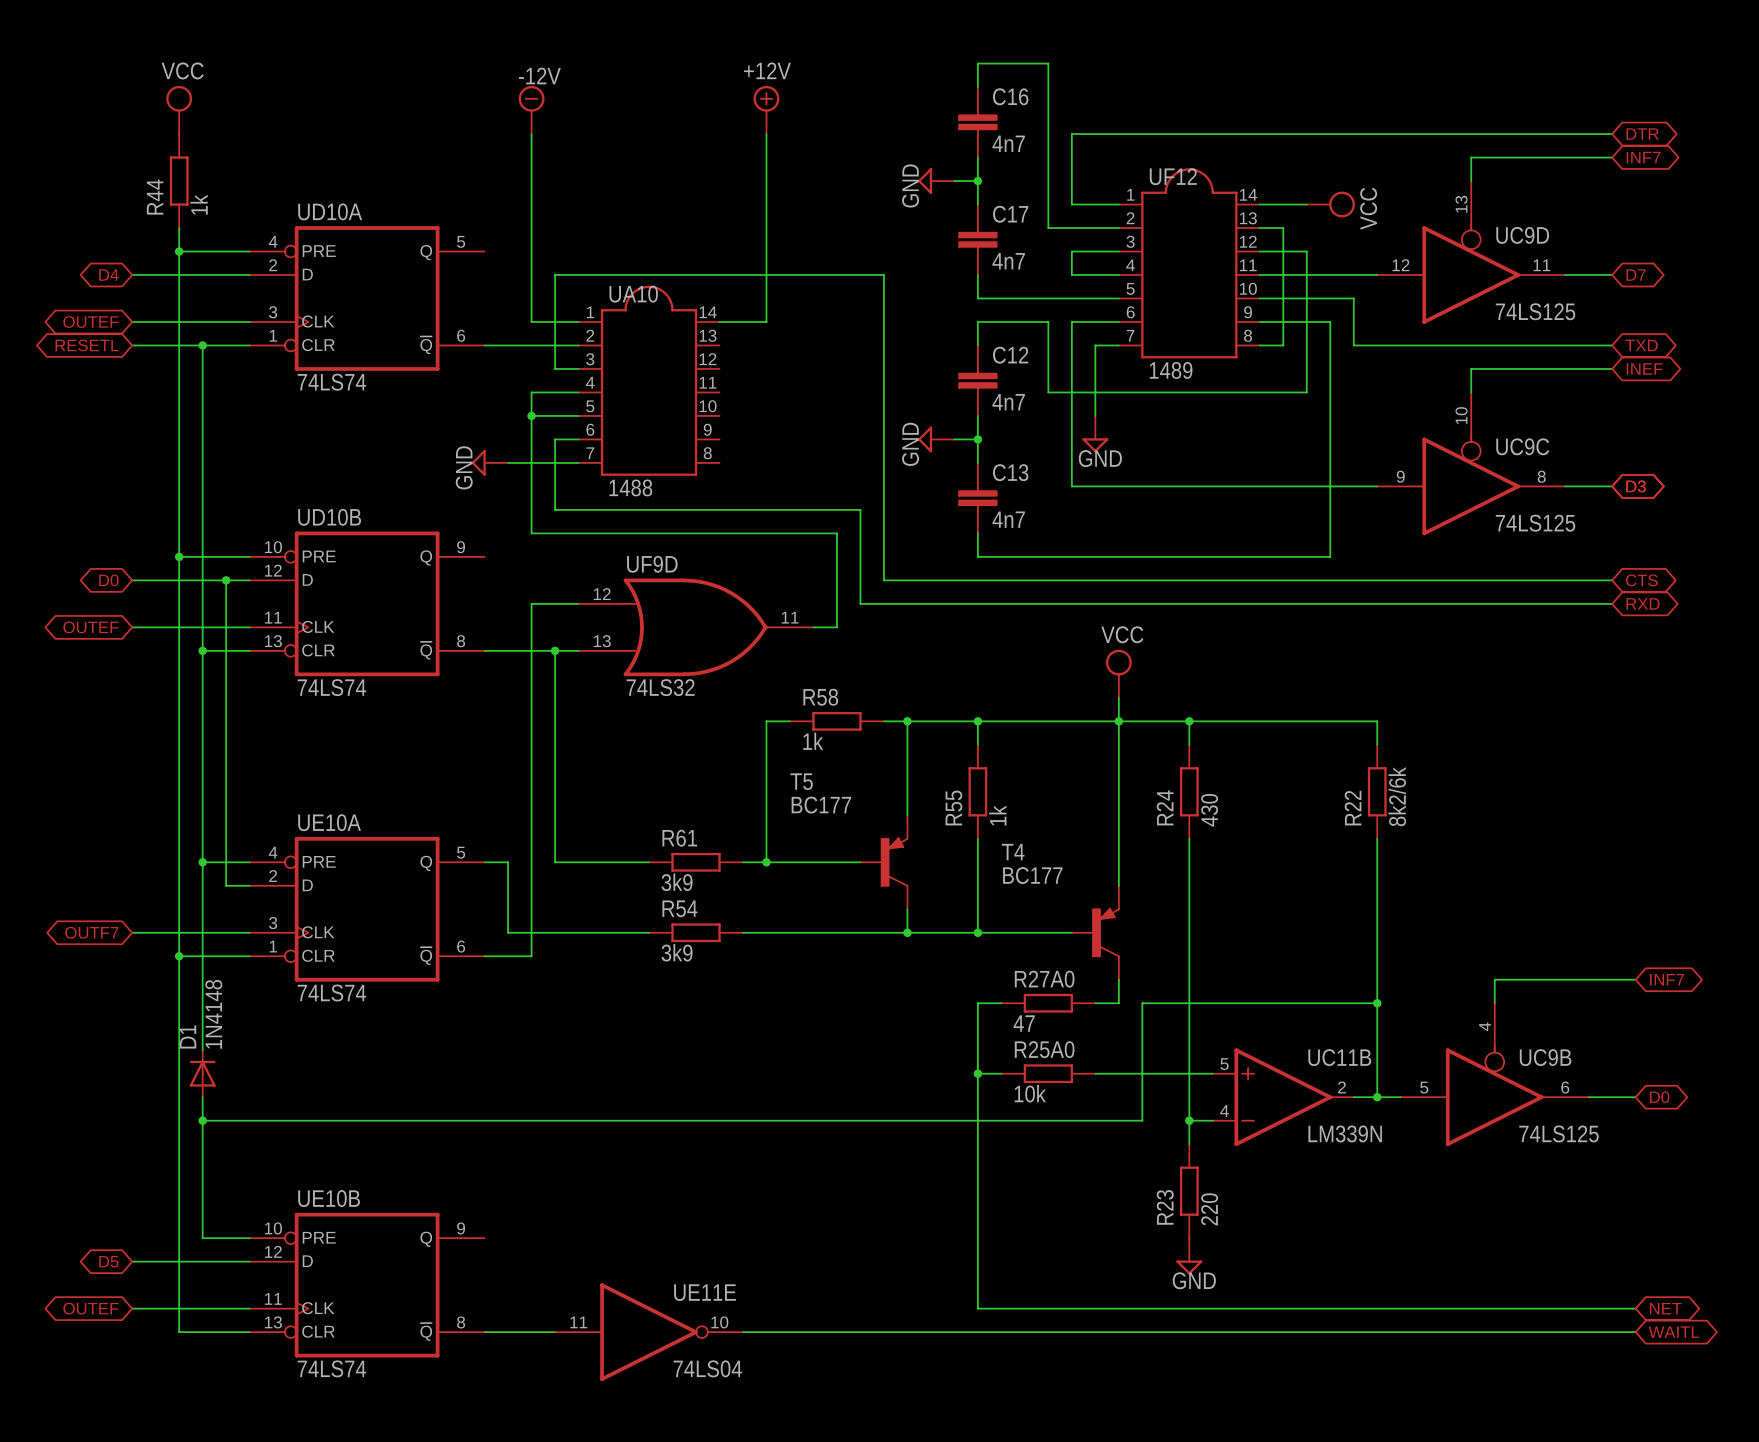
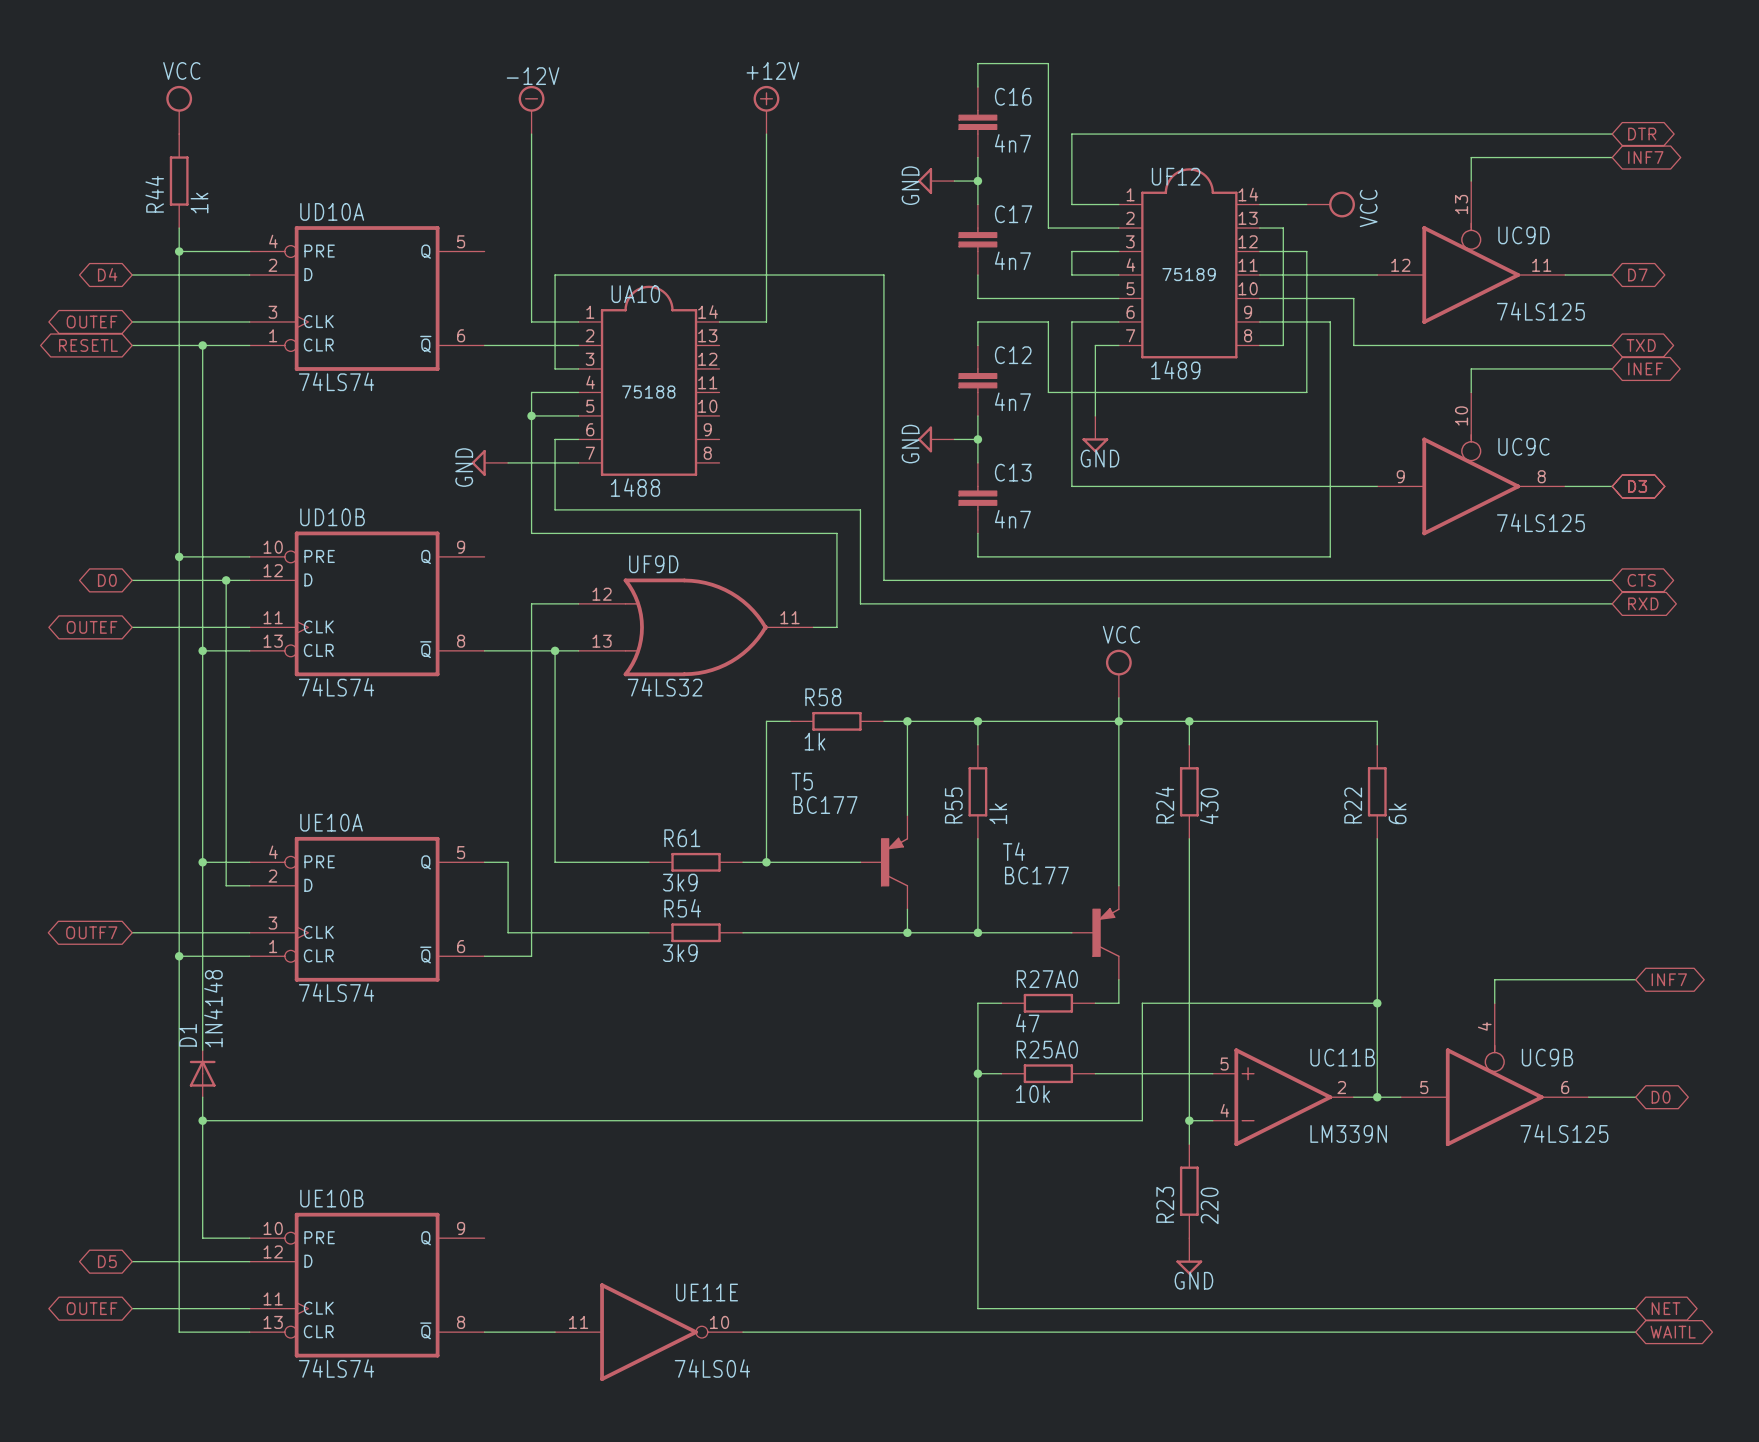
UF12 text: none -> 75189 (1189, 274)
UA10 text: none -> 75188 (648, 392)
R22 value: 8k2/6k (1397, 796) -> 6k (1397, 813)

